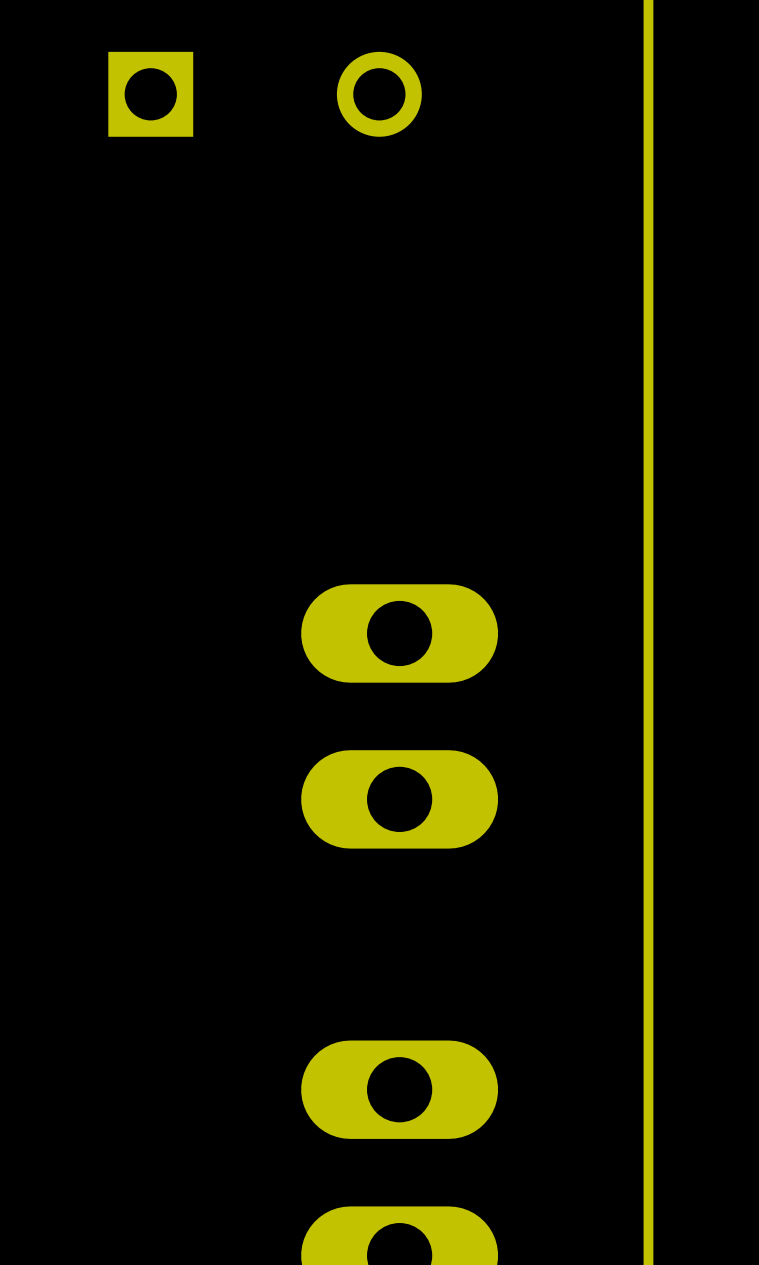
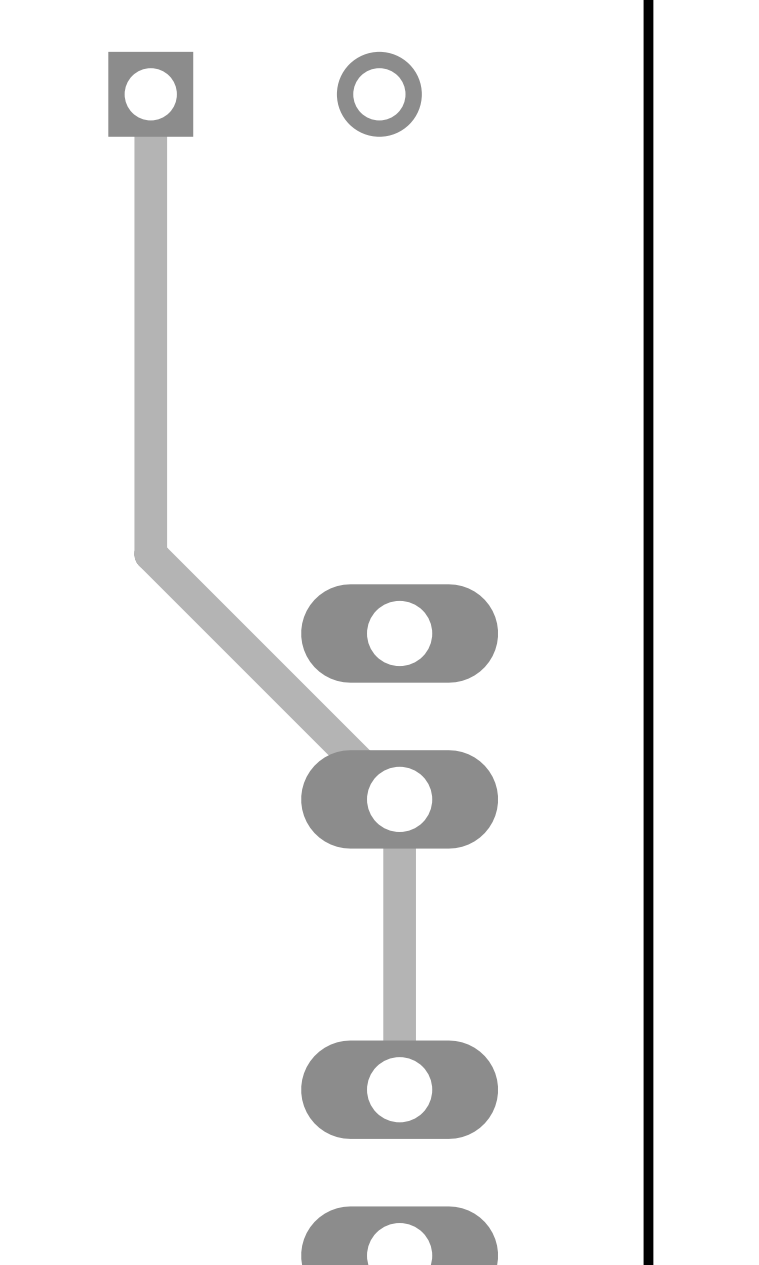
track: none -> (150, 94) (150, 554) (395, 799) (399, 799) (399, 1089)

